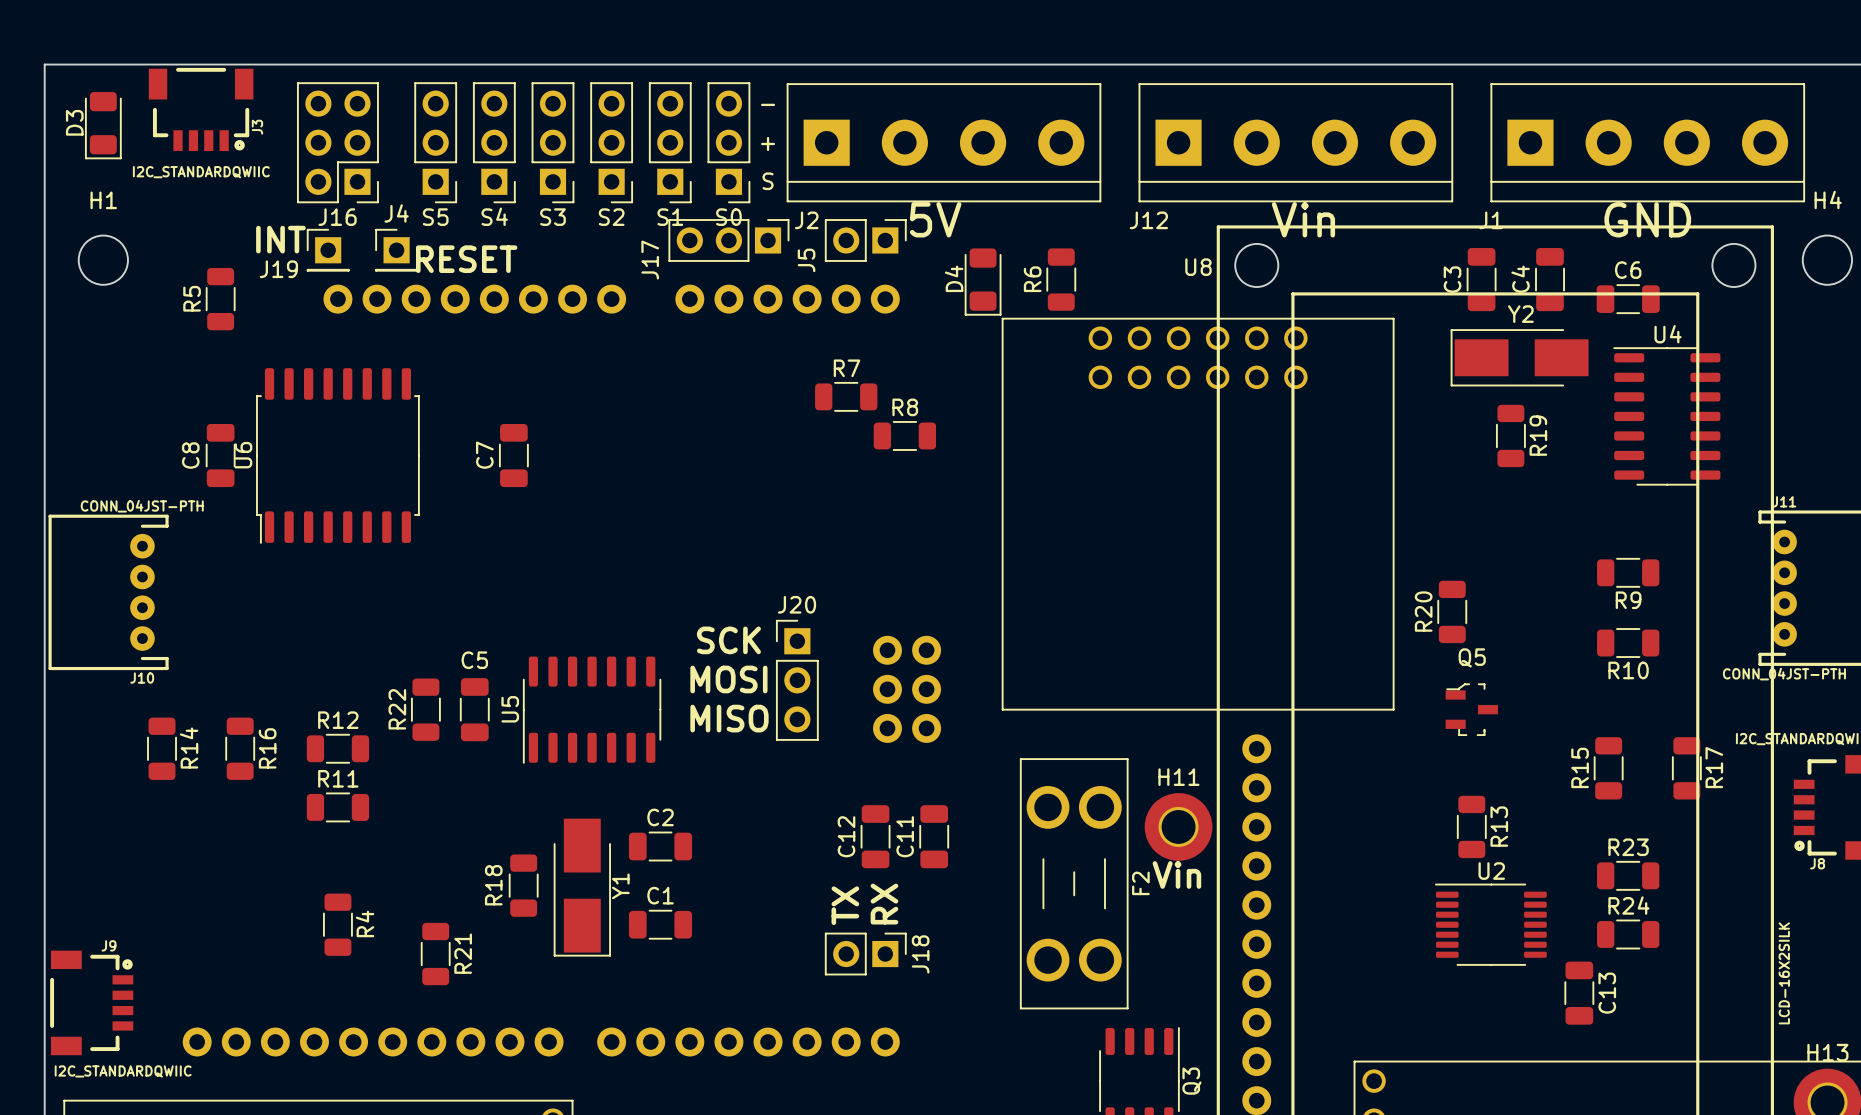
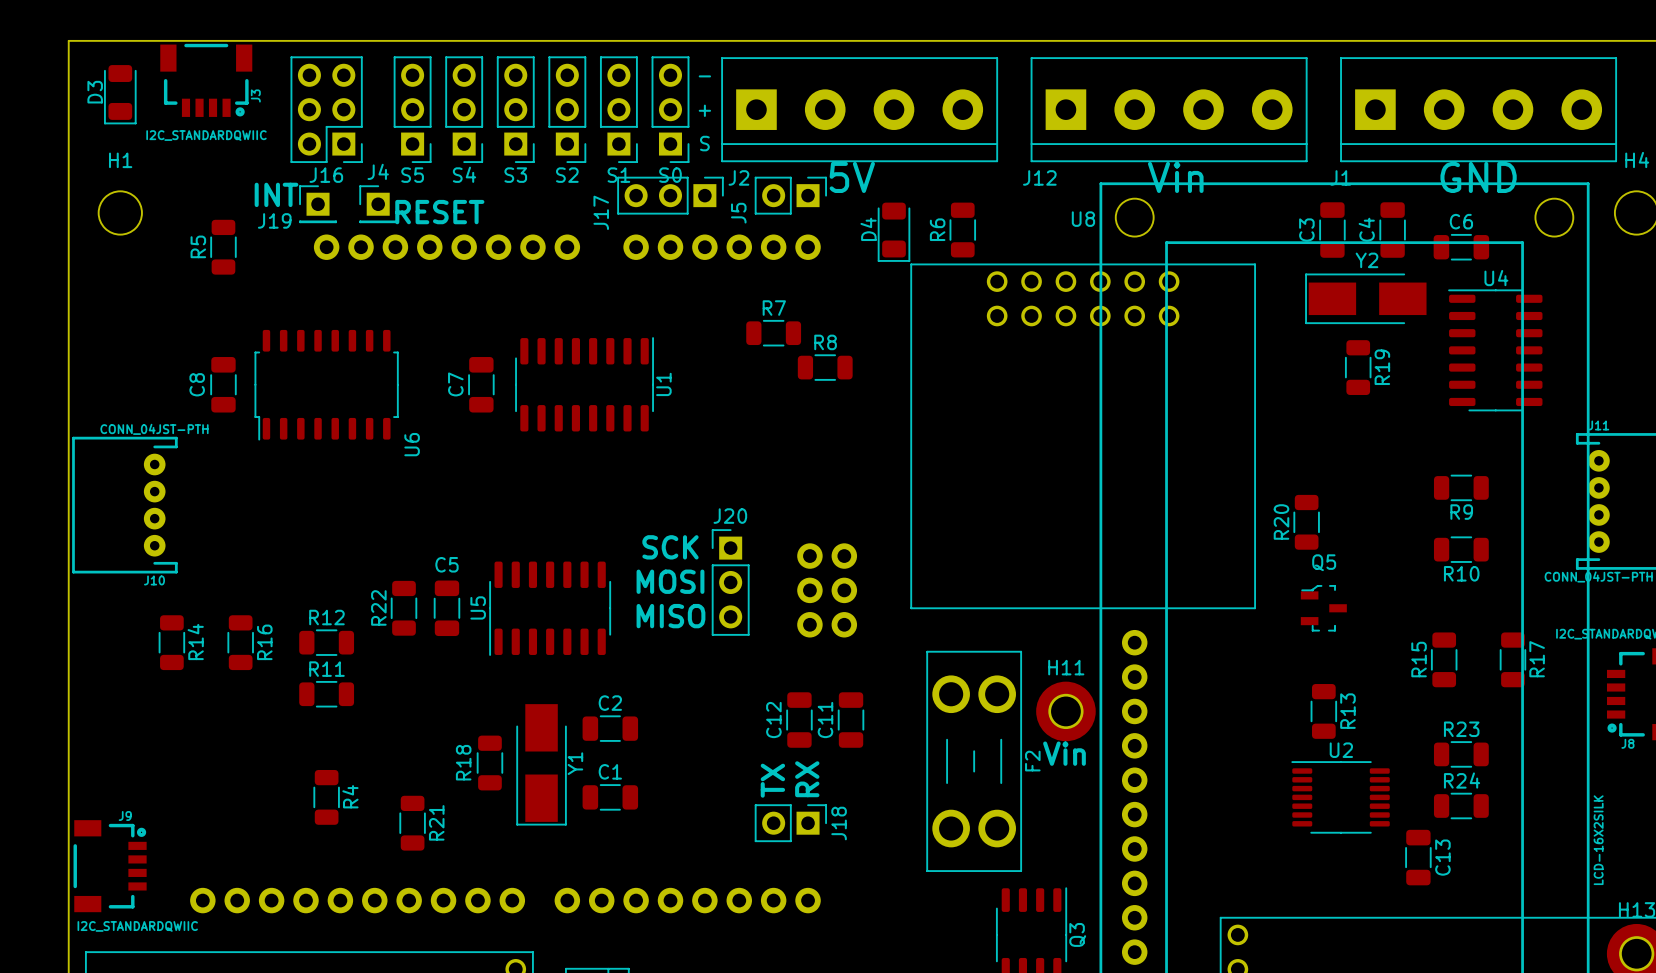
U6 footprint: [256, 368, 420, 544] -> [254, 329, 399, 441]
U6 name position: U6 (243, 455) -> U6 (412, 444)
U1: none -> (584, 384)

